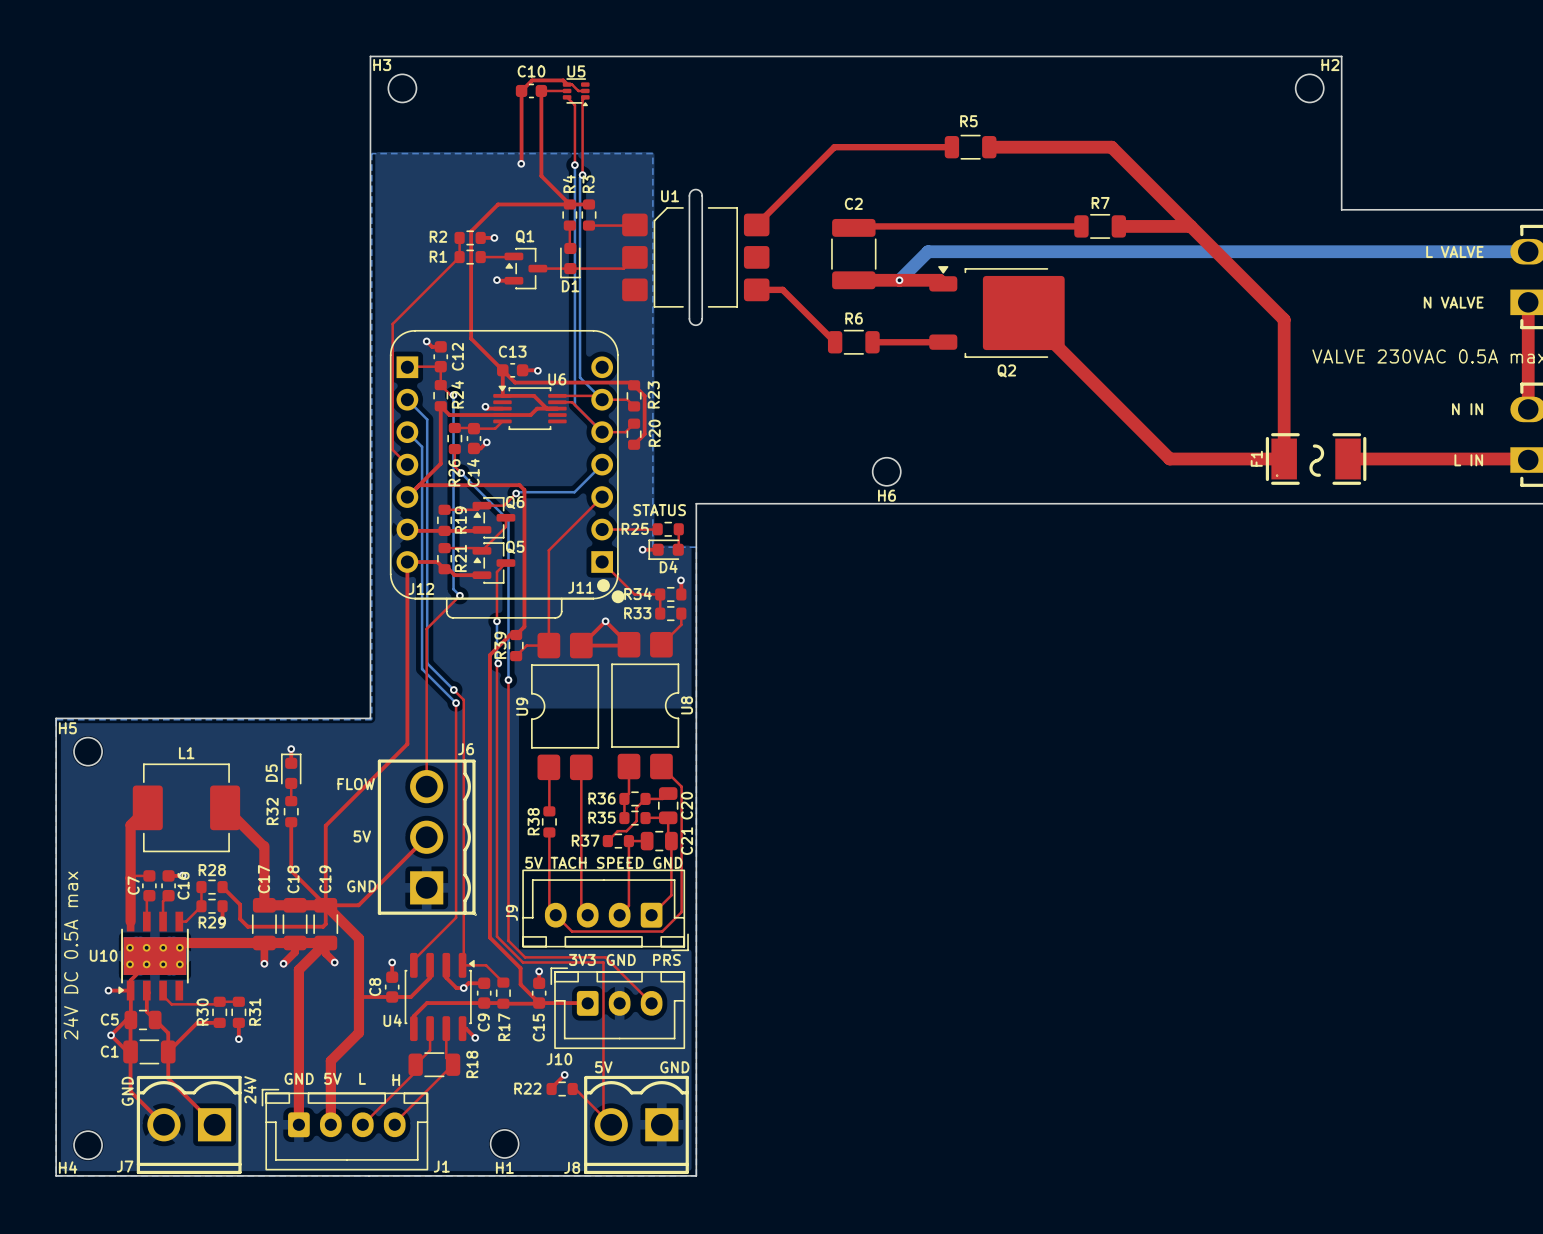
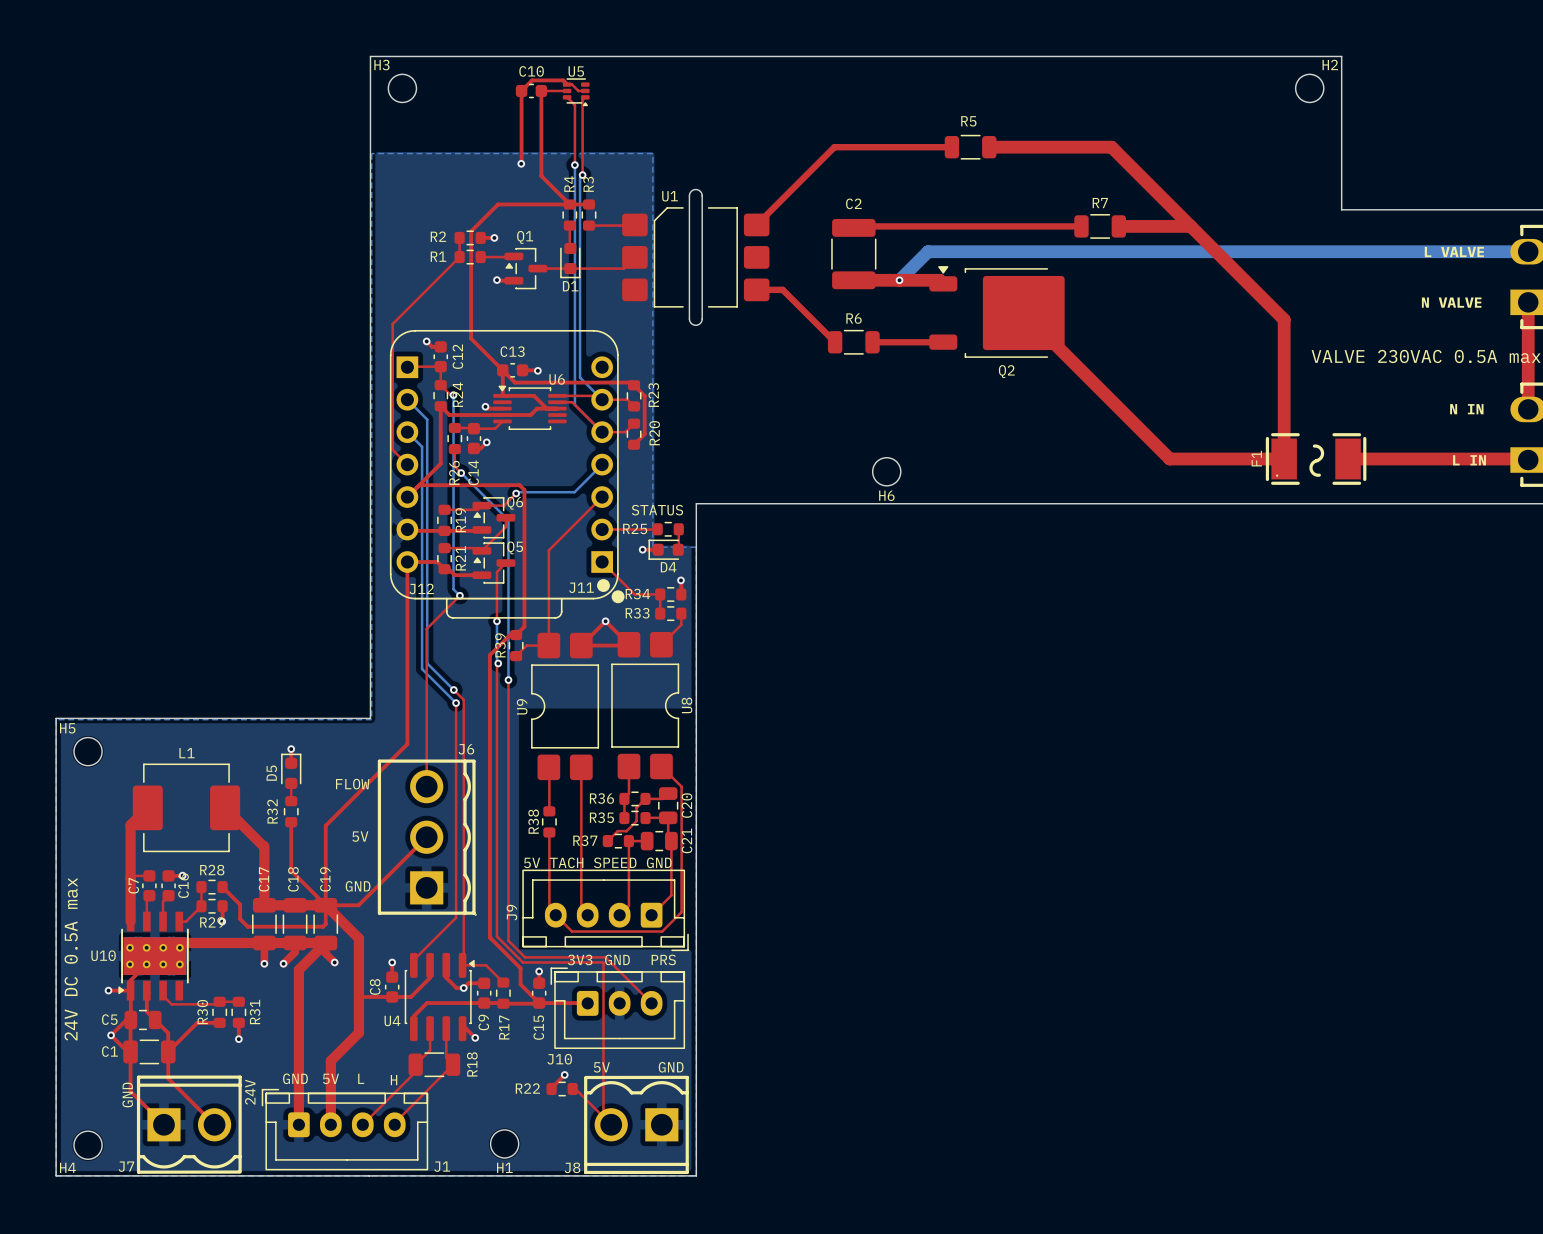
J7 rotation: 0° (189, 1124) -> 180° (189, 1124)

